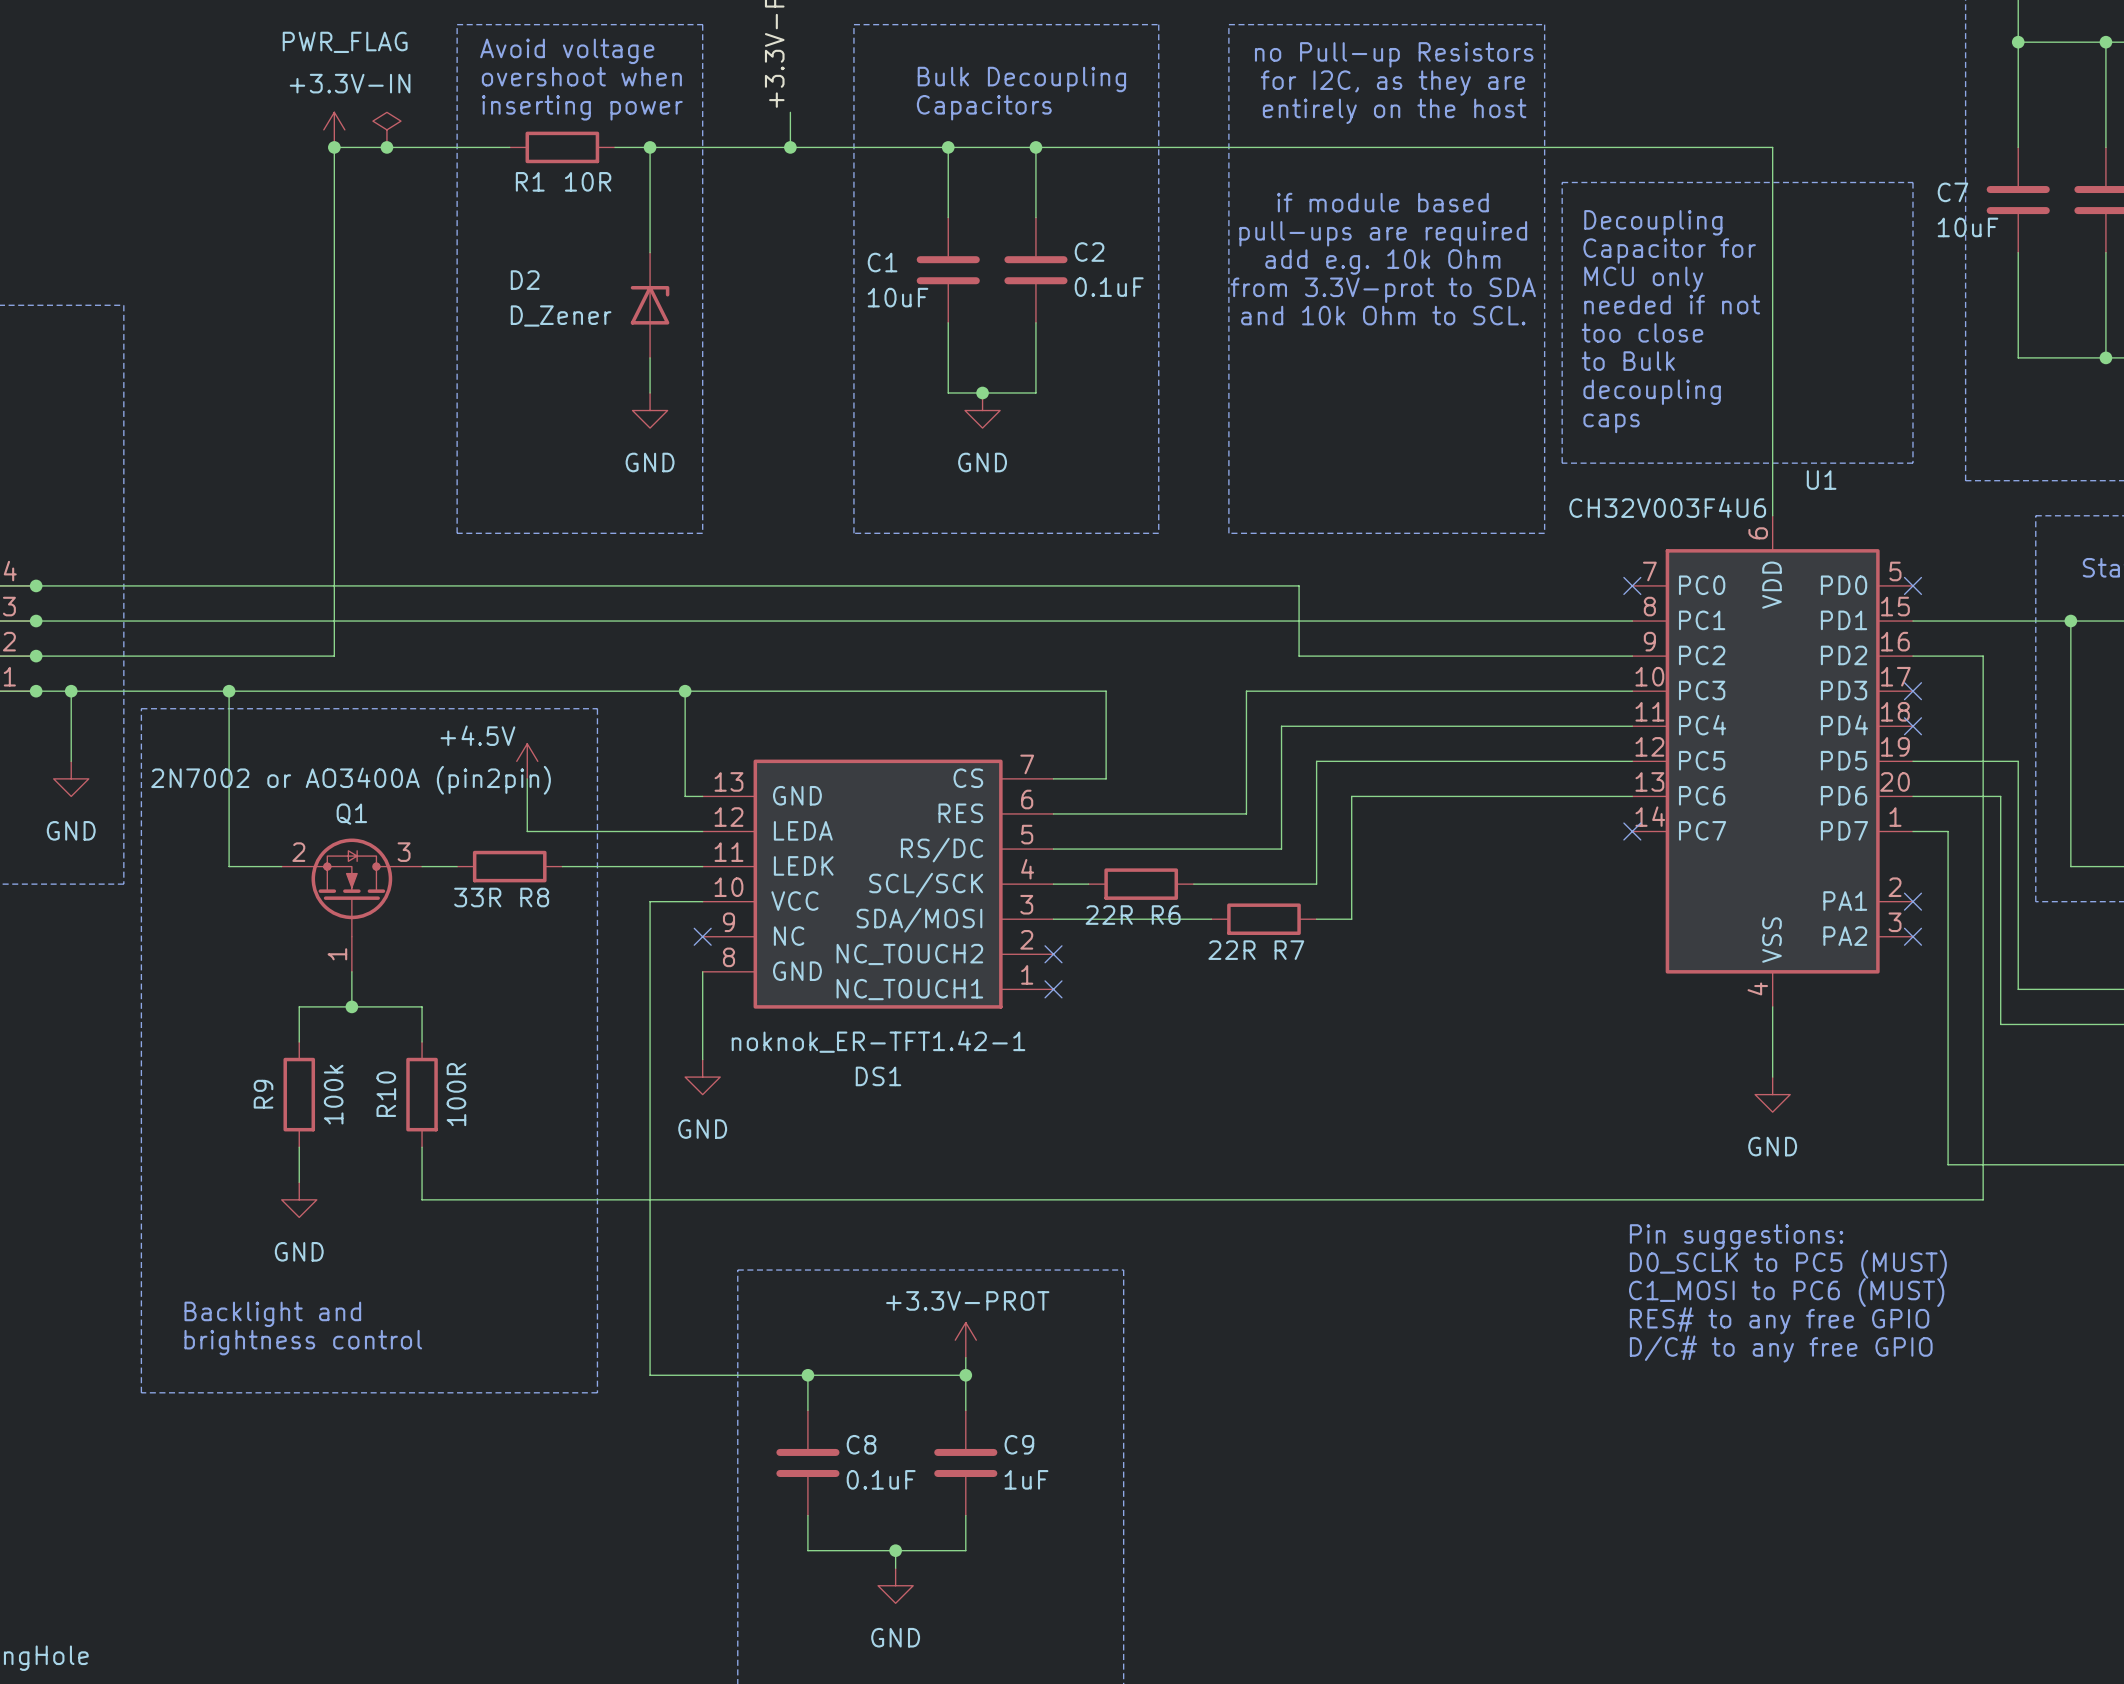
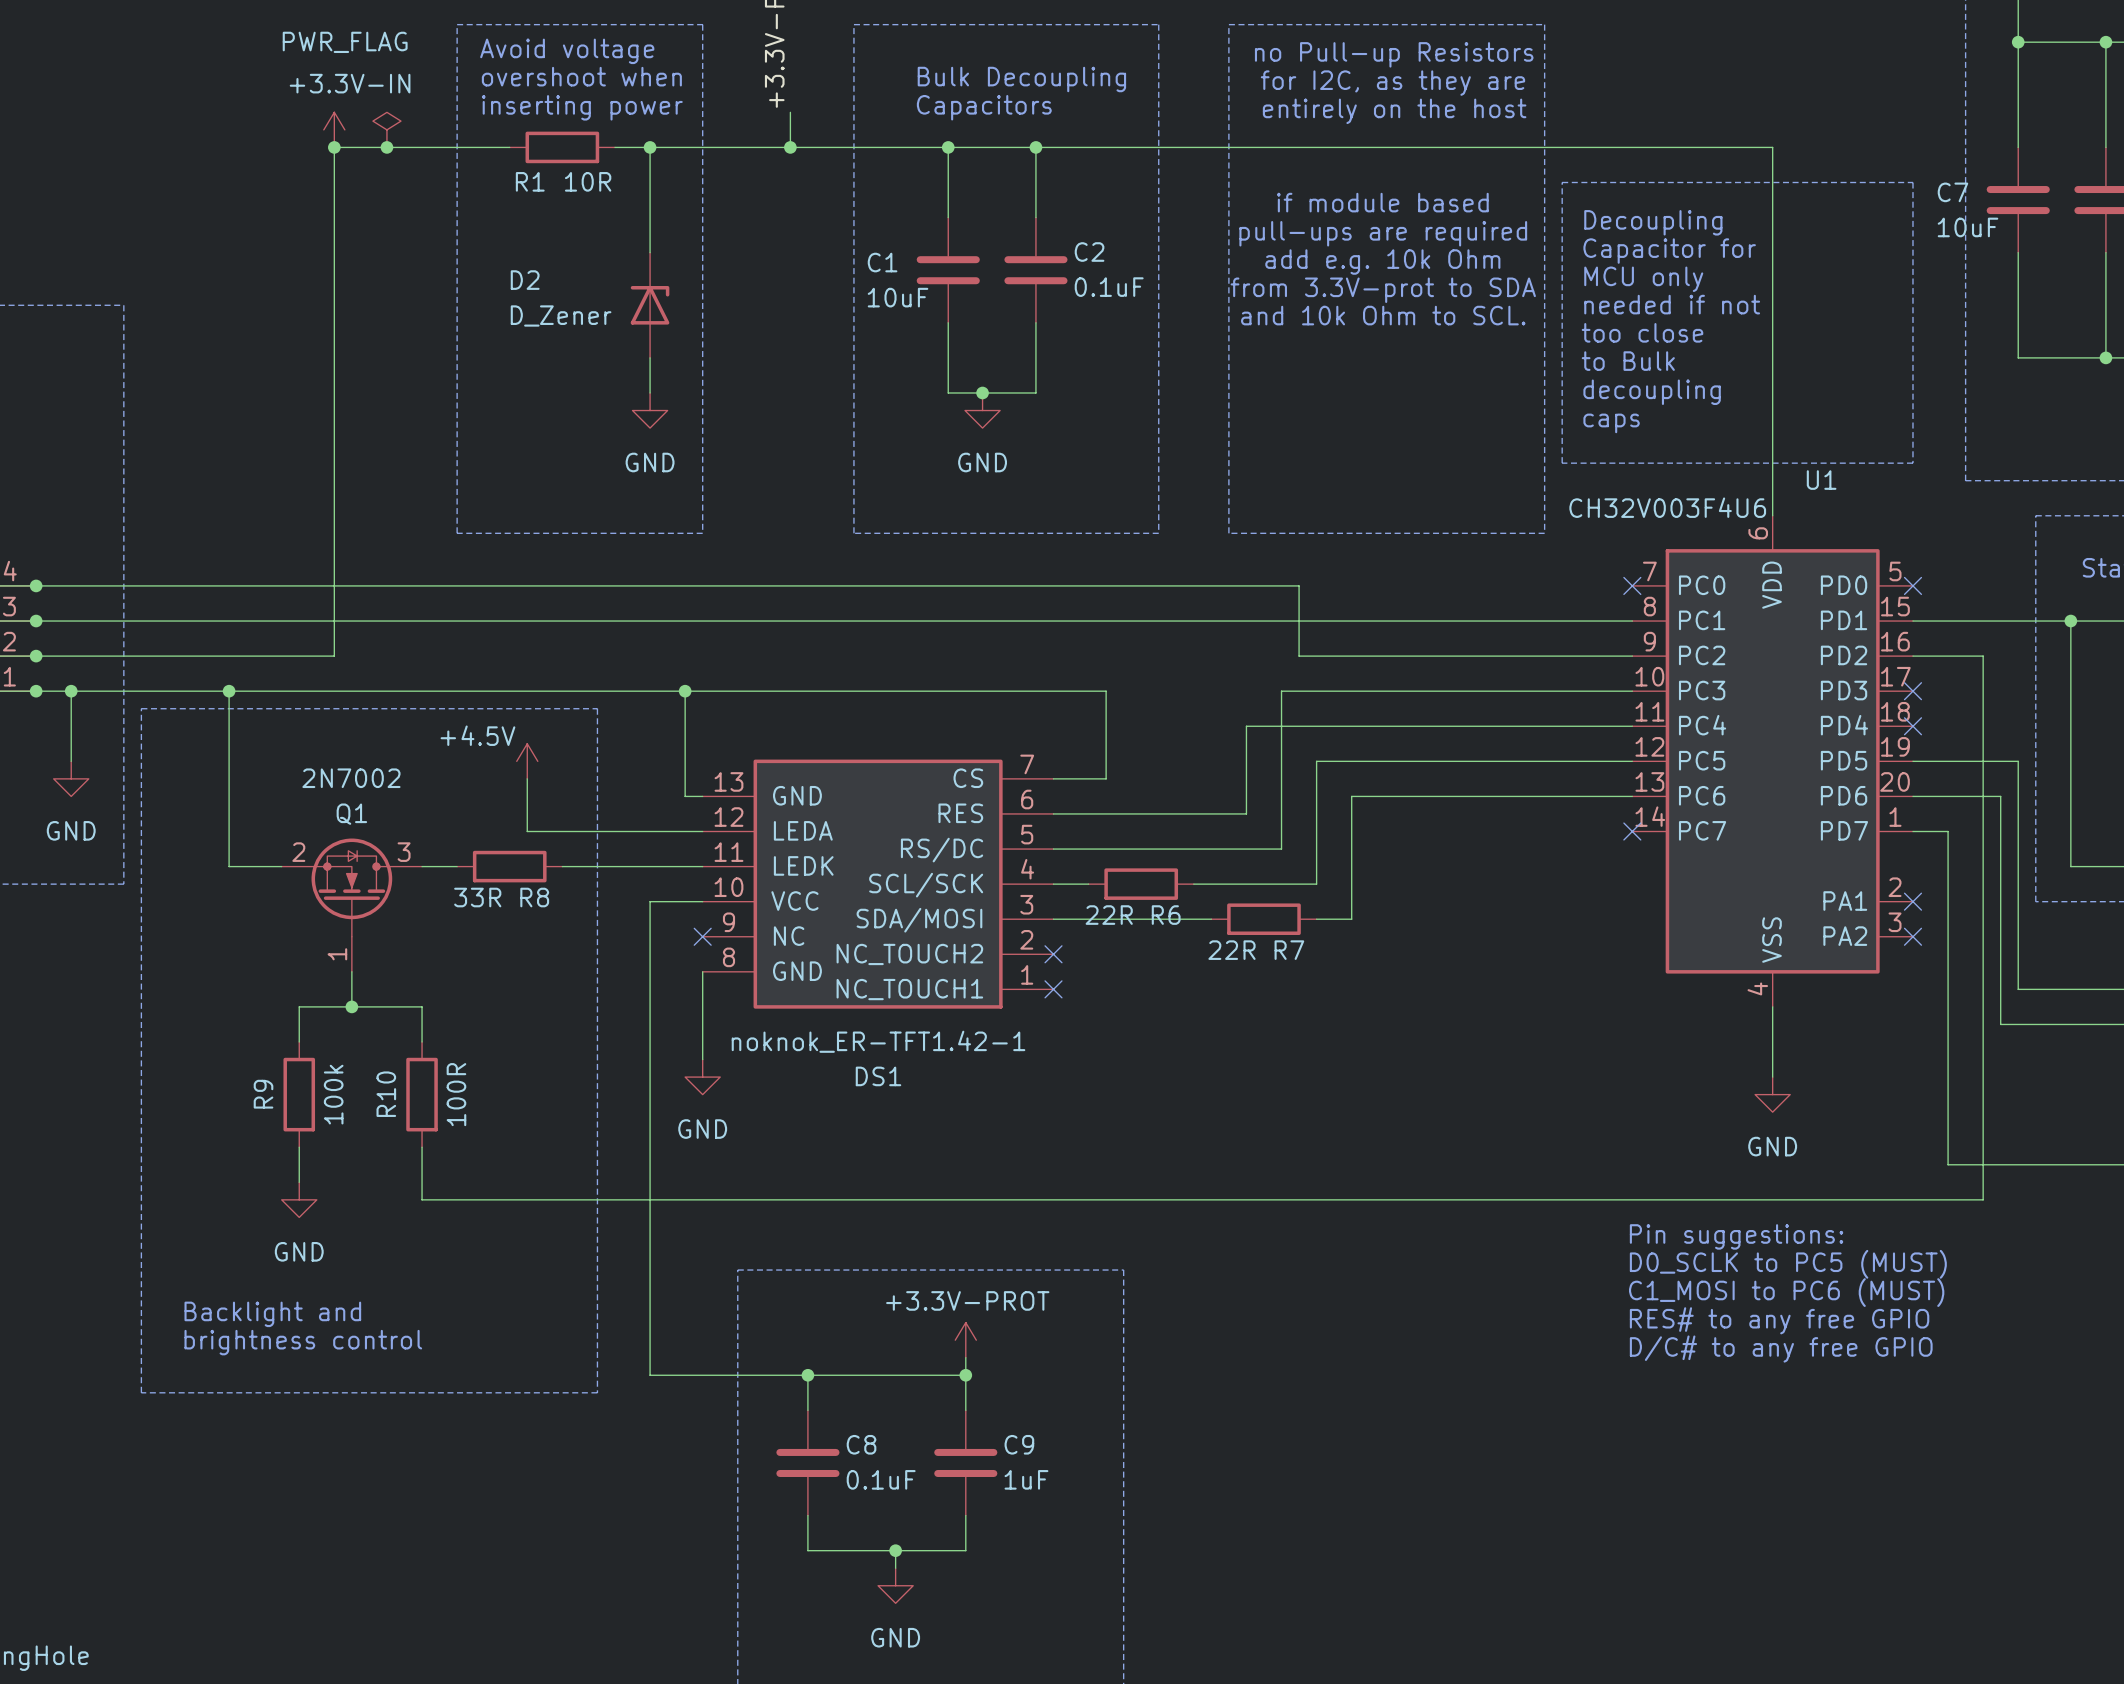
wire: (1281, 691) (1246, 691) (1246, 726) -> (1281, 691) (1281, 726) (1246, 726)
Q1 value: 2N7002 or AO3400A (pin2pin) (351, 780) -> 2N7002 (351, 778)

